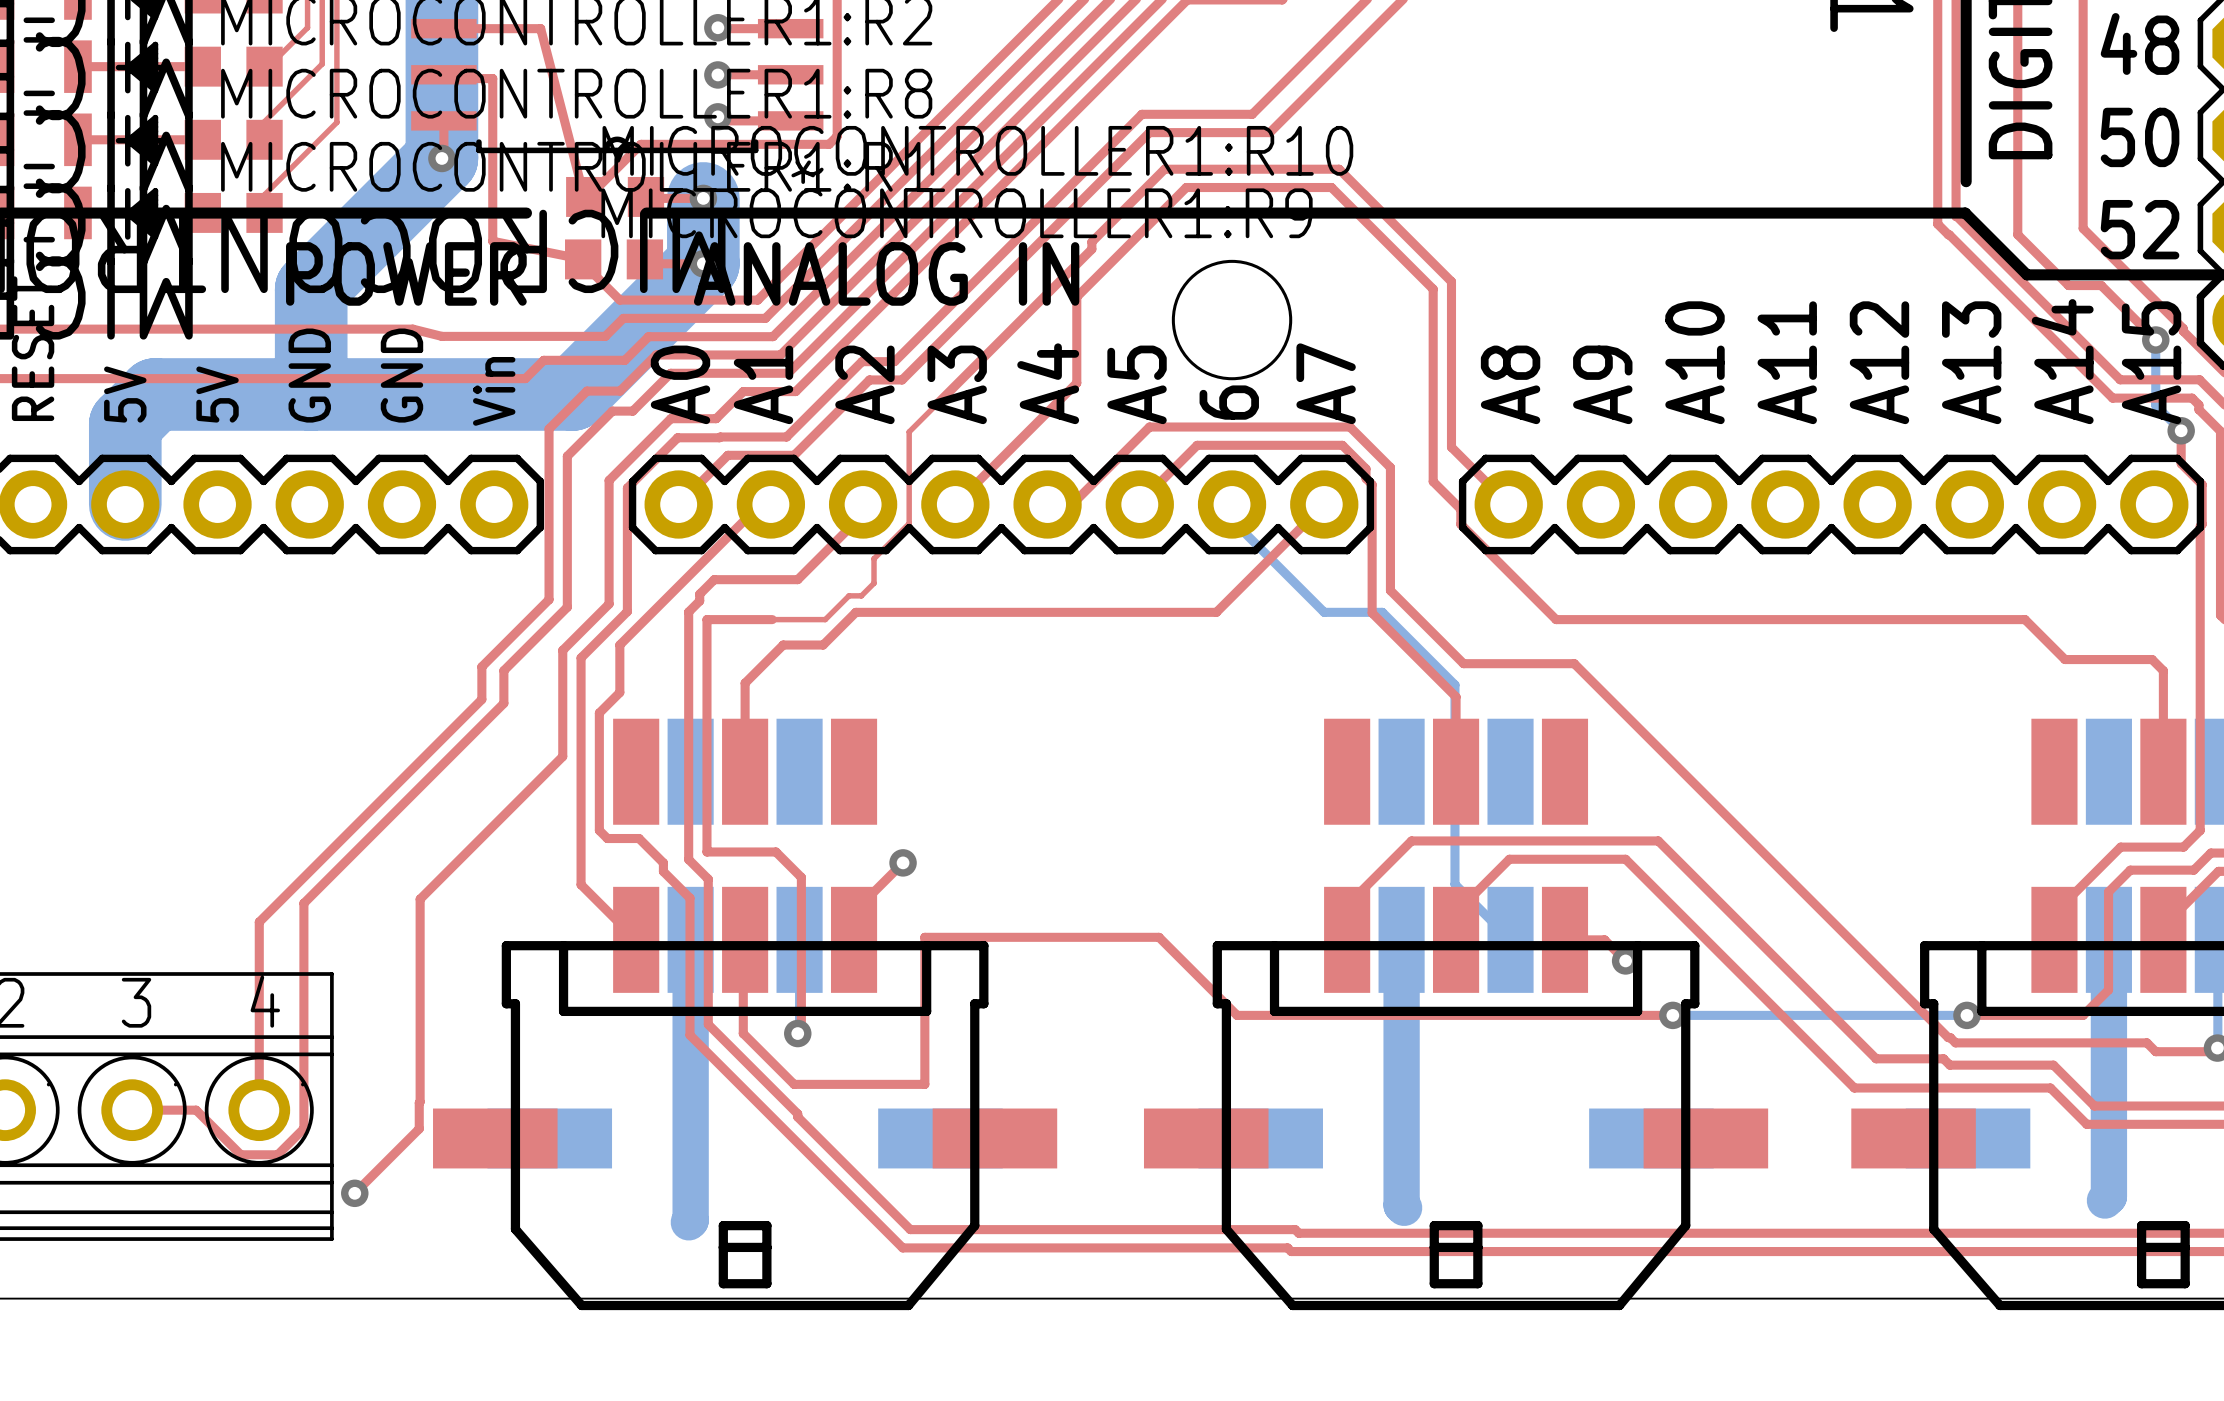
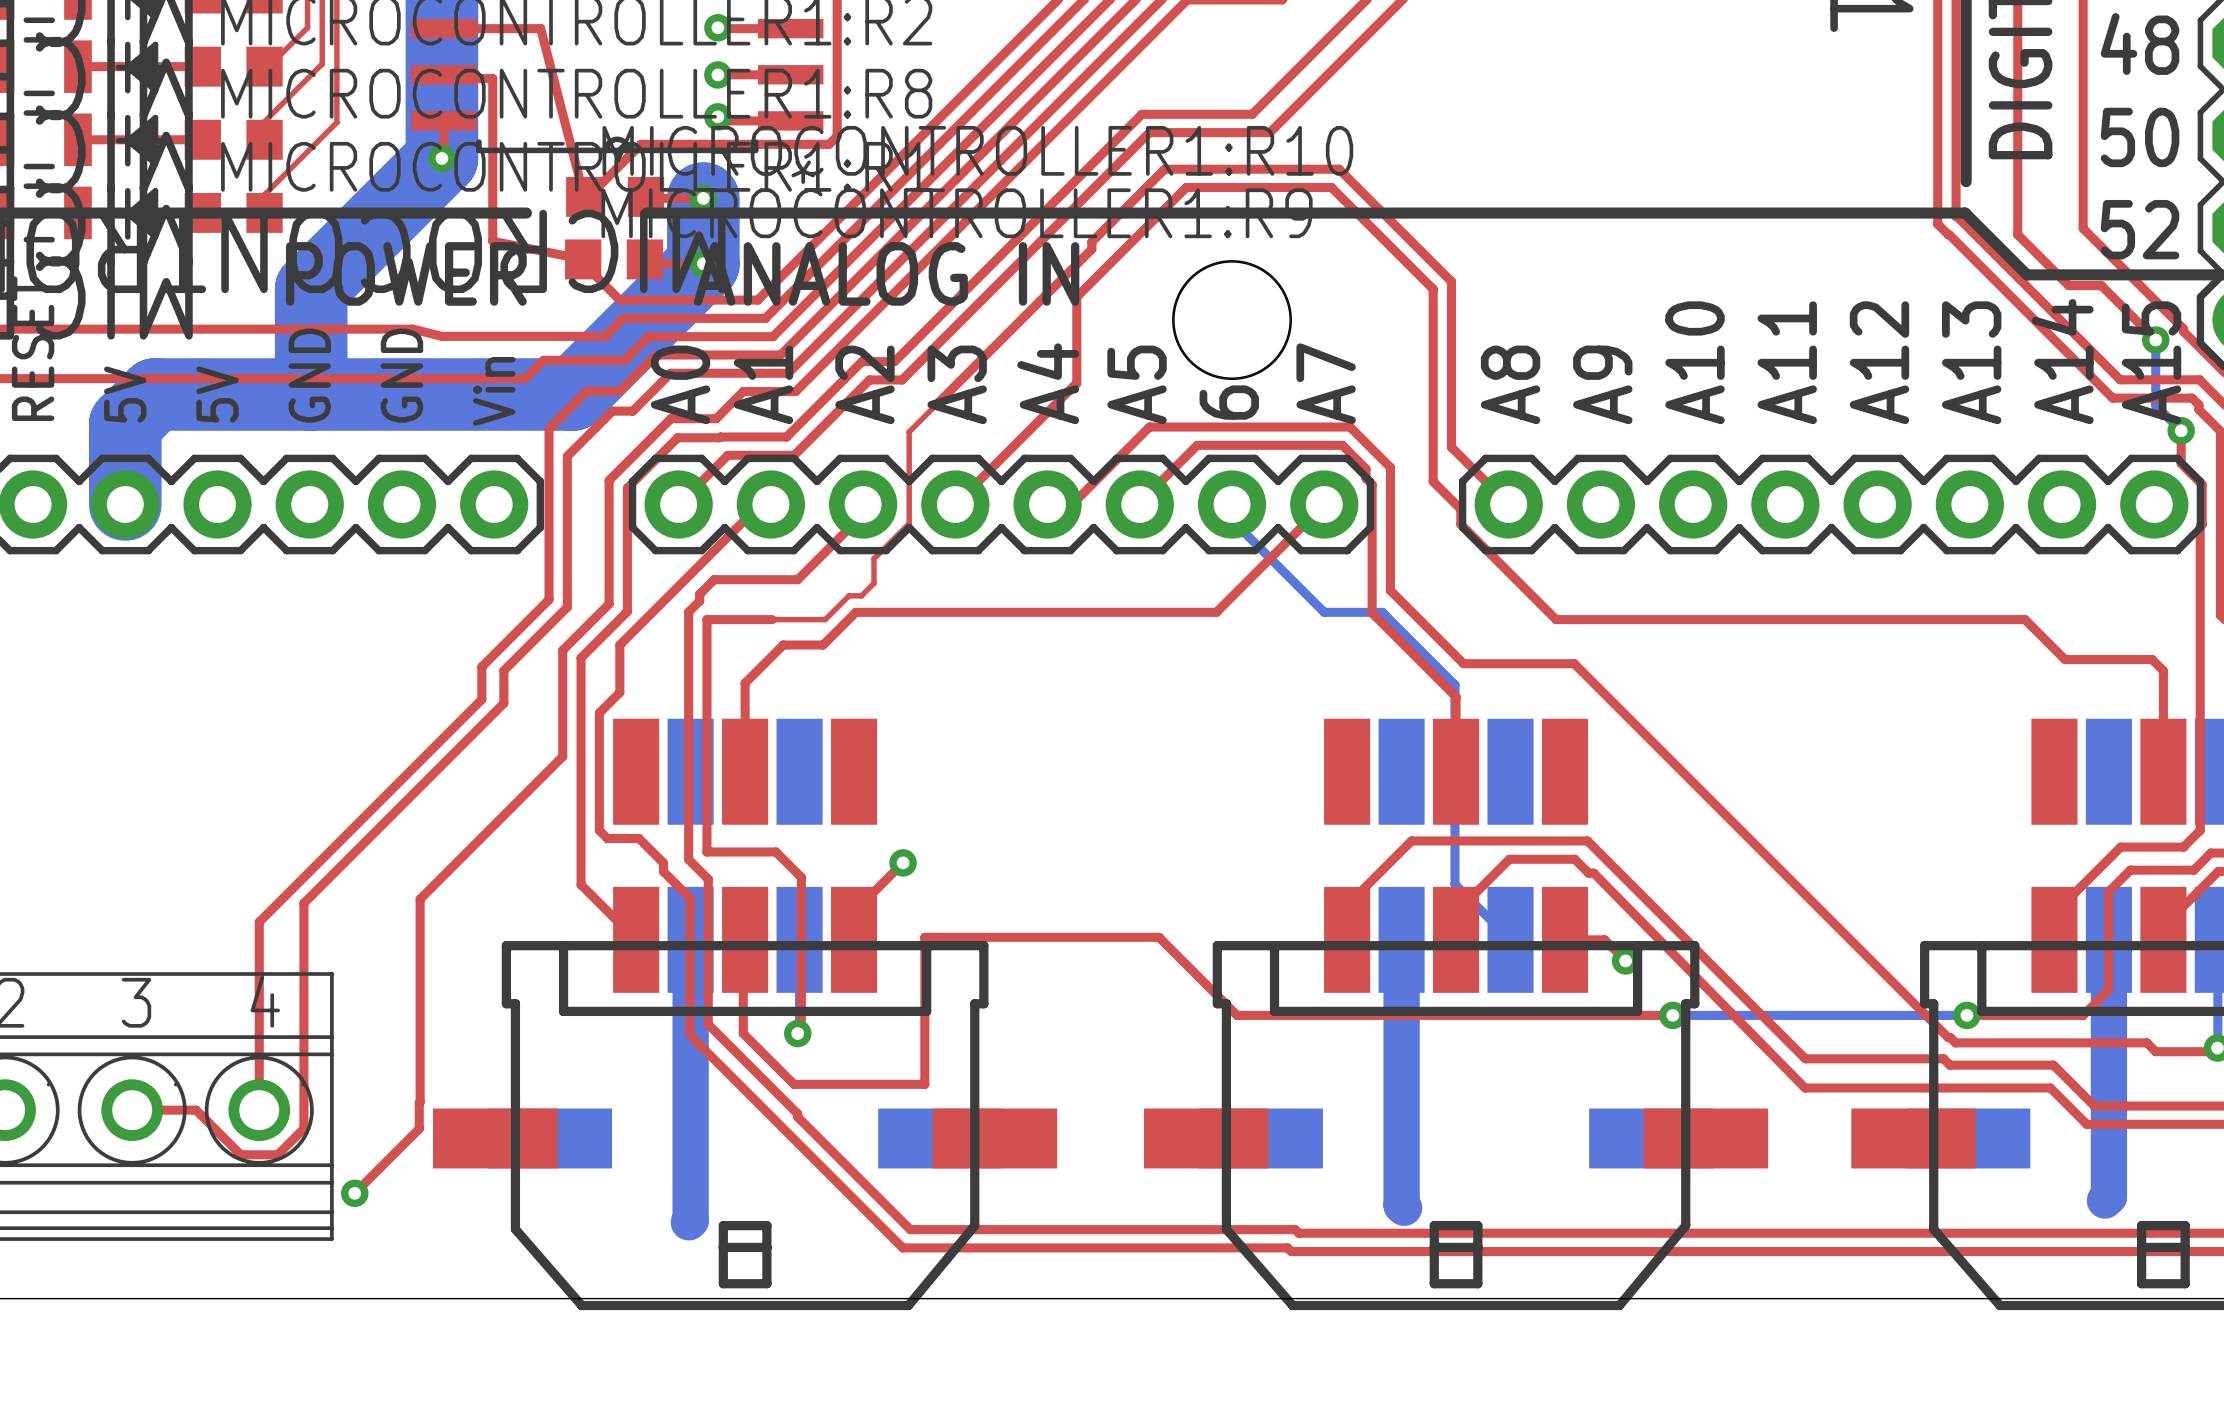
top track: (1587, 840) (1658, 840) (1876, 1058) -> (1587, 840) (1805, 1058) (1876, 1058)
top track: (1574, 859) (1625, 859) (1854, 1088) -> (1574, 859) (1588, 873) (1593, 873) (1805, 1088) (1854, 1088)

